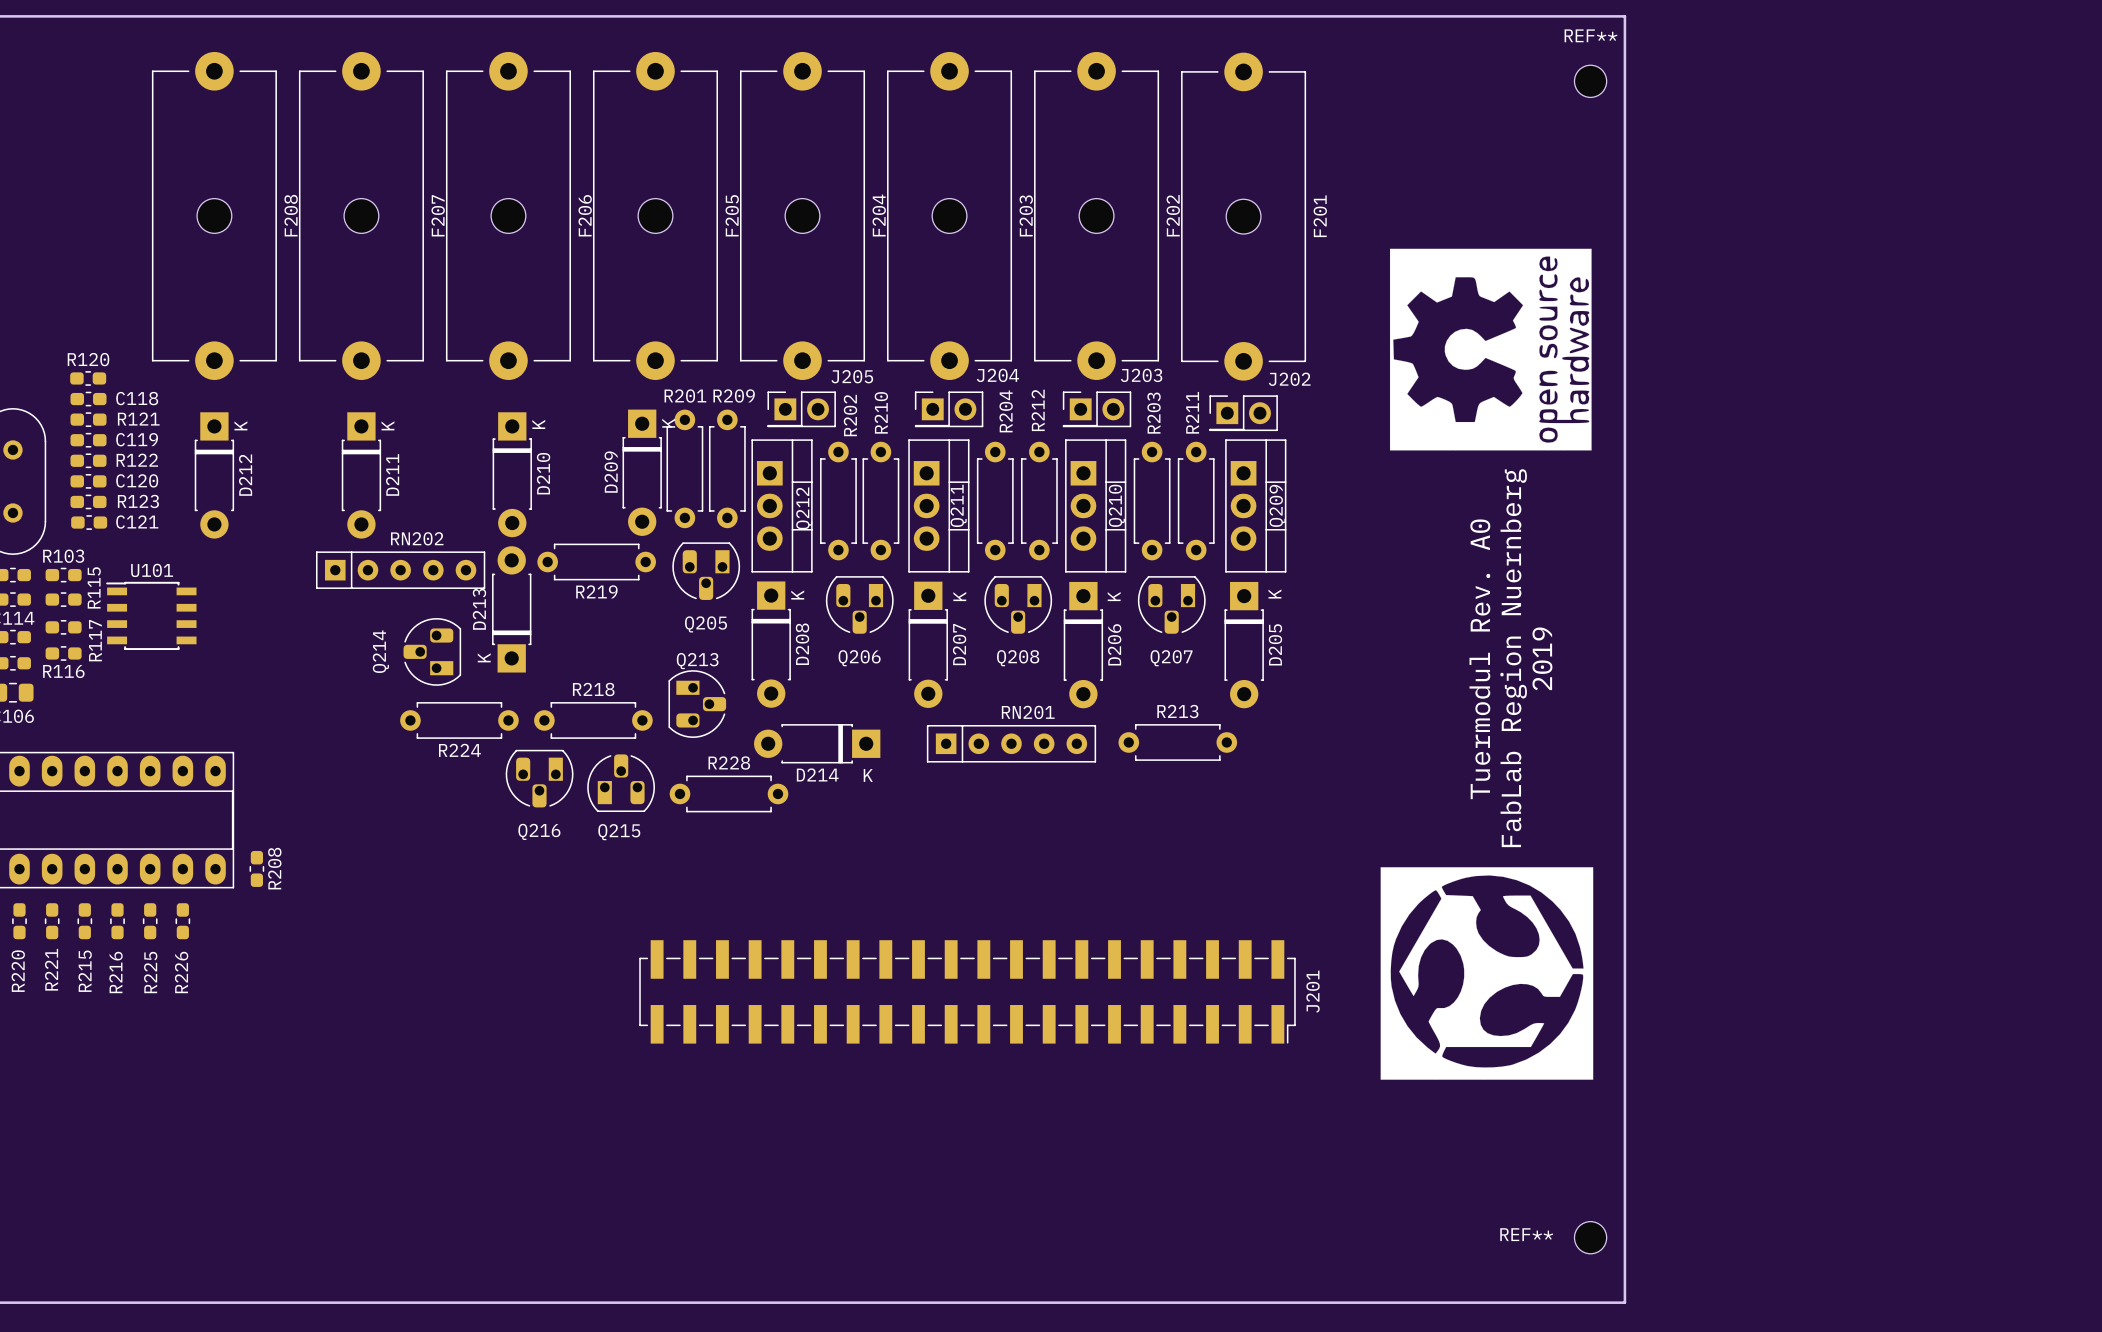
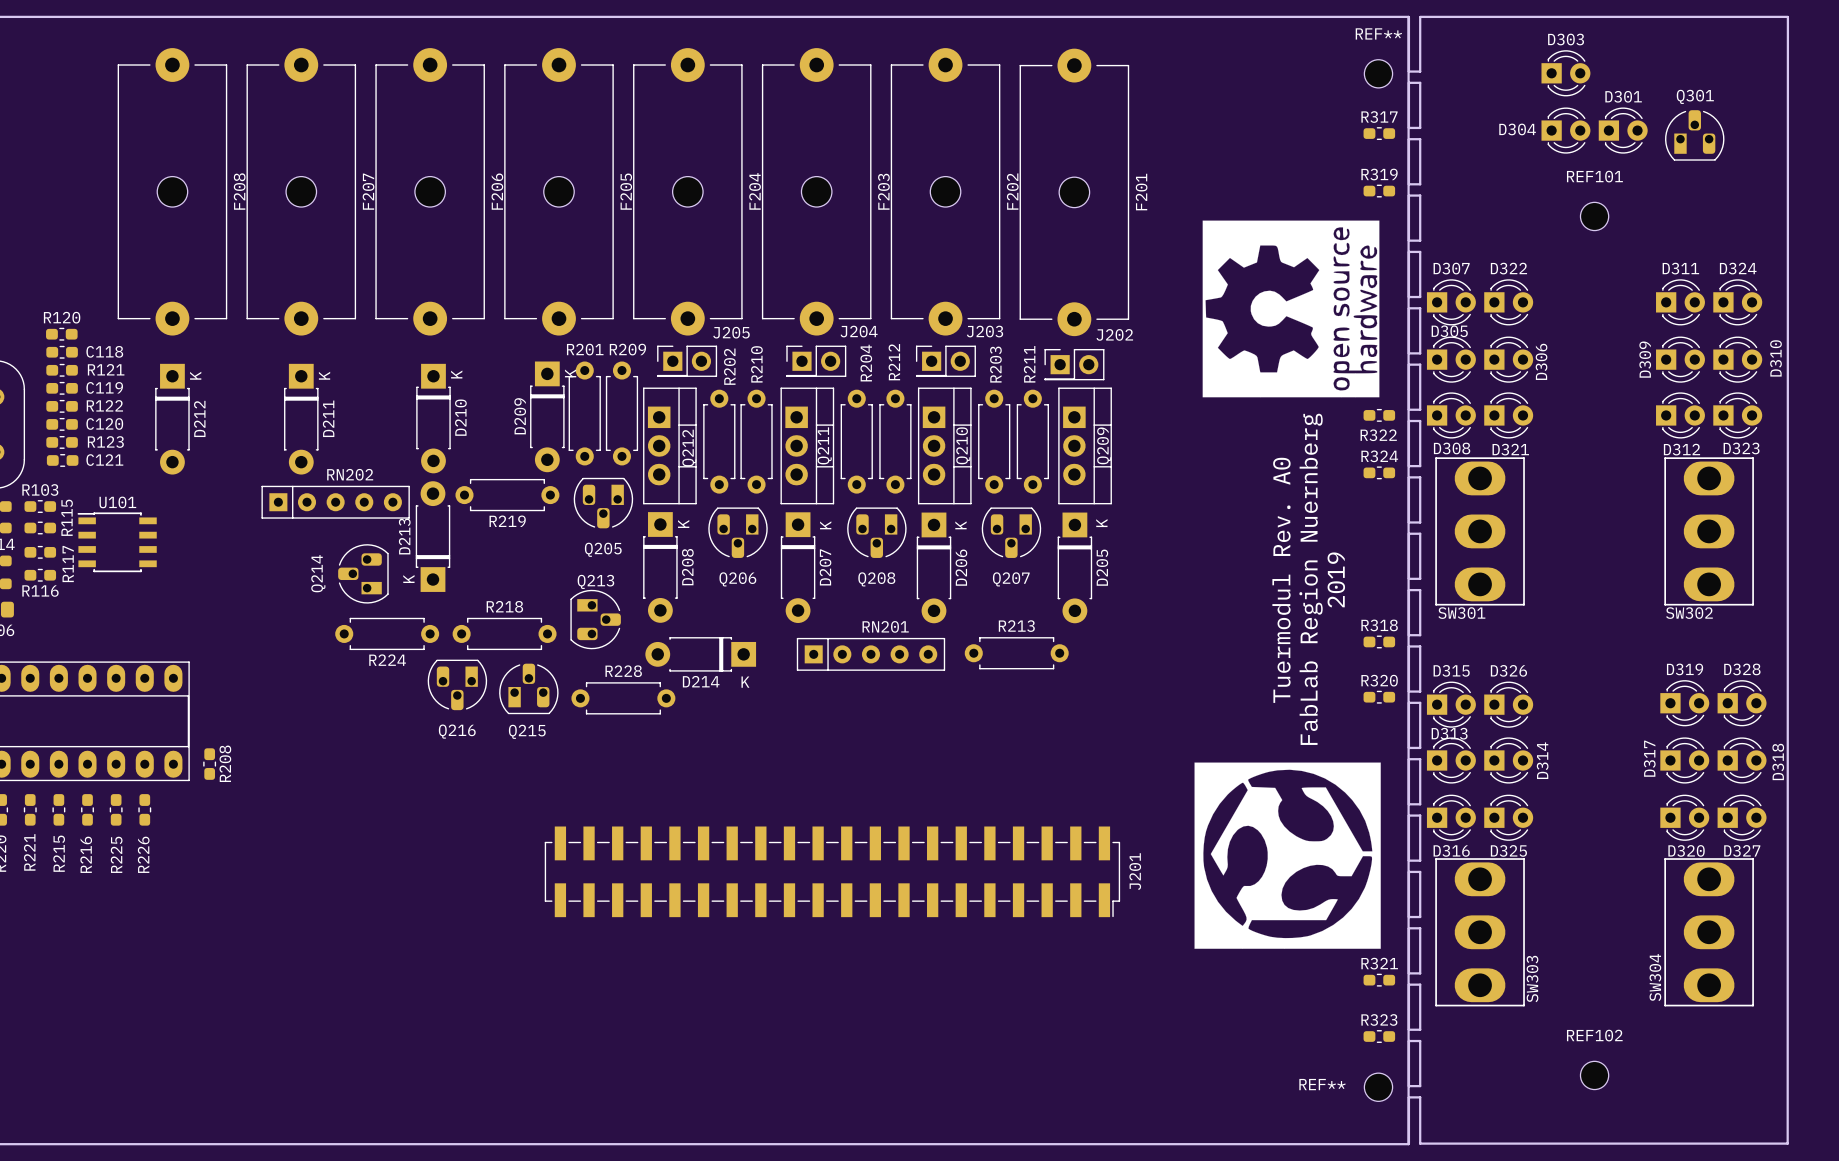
board edge: none -> (1420, 16) (1787, 16)
board edge: none -> (1408, 17) (1408, 71) (1420, 71) (1420, 17)
board edge: none -> (1787, 17) (1787, 1143) (1420, 1143) (1420, 1097) (1408, 1097) (1408, 1143)
D303: none -> (1565, 73)
board edge: none -> (1408, 82) (1408, 127) (1420, 127) (1420, 82) (1408, 82)
D304: none -> (1565, 130)
D301: none -> (1623, 130)
R317: none -> (1379, 133)
Q301: none -> (1694, 135)
board edge: none -> (1408, 139) (1408, 184) (1420, 184) (1420, 139) (1408, 139)
R319: none -> (1379, 191)
board edge: none -> (1408, 195) (1408, 240) (1420, 240) (1420, 195) (1408, 195)
REF101: none -> (1594, 216)
board edge: none -> (1408, 251) (1408, 297) (1420, 297) (1420, 251) (1408, 251)
D307: none -> (1451, 302)
D322: none -> (1508, 302)
D311: none -> (1680, 302)
D324: none -> (1737, 302)
board edge: none -> (1408, 308) (1408, 353) (1420, 353) (1420, 308) (1408, 308)
D305: none -> (1451, 359)
D306: none -> (1508, 359)
D309: none -> (1680, 359)
D310: none -> (1737, 359)
board edge: none -> (1408, 364) (1408, 409) (1420, 409) (1420, 364) (1408, 364)
R322: none -> (1379, 415)
D308: none -> (1451, 415)
D321: none -> (1508, 415)
D312: none -> (1680, 415)
D323: none -> (1737, 415)
board edge: none -> (1408, 421) (1408, 466) (1420, 466) (1420, 421) (1408, 421)
R324: none -> (1379, 472)
board edge: none -> (1408, 477) (1408, 522) (1420, 522) (1420, 477) (1408, 477)
SW301: none -> (1480, 531)
SW302: none -> (1709, 531)
board edge: none -> (1408, 533) (1408, 578) (1420, 578) (1420, 533) (1408, 533)
board edge: none -> (1408, 590) (1408, 635) (1420, 635) (1420, 590) (1408, 590)
R318: none -> (1379, 641)
board edge: none -> (1408, 646) (1408, 691) (1420, 691) (1420, 646) (1408, 646)
R320: none -> (1379, 697)
board edge: none -> (1408, 702) (1408, 747) (1420, 747) (1420, 702) (1408, 702)
D319: none -> (1684, 703)
D328: none -> (1742, 703)
D315: none -> (1451, 704)
D326: none -> (1508, 704)
board edge: none -> (1408, 759) (1408, 804) (1420, 804) (1420, 759) (1408, 759)
D313: none -> (1451, 760)
D314: none -> (1508, 760)
D317: none -> (1684, 760)
D318: none -> (1742, 760)
board edge: none -> (1408, 815) (1408, 860) (1420, 860) (1420, 815) (1408, 815)
D316: none -> (1451, 817)
D325: none -> (1508, 817)
D320: none -> (1684, 817)
D327: none -> (1742, 817)
board edge: none -> (1408, 871) (1408, 917) (1420, 917) (1420, 871) (1408, 871)
board edge: none -> (1408, 928) (1408, 973) (1420, 973) (1420, 928) (1408, 928)
SW303: none -> (1480, 932)
SW304: none -> (1709, 932)
R321: none -> (1379, 980)
board edge: none -> (1408, 984) (1408, 1029) (1420, 1029) (1420, 984) (1408, 984)
R323: none -> (1379, 1036)
board edge: none -> (1408, 1041) (1408, 1086) (1420, 1086) (1420, 1041) (1408, 1041)
REF102: none -> (1594, 1075)

